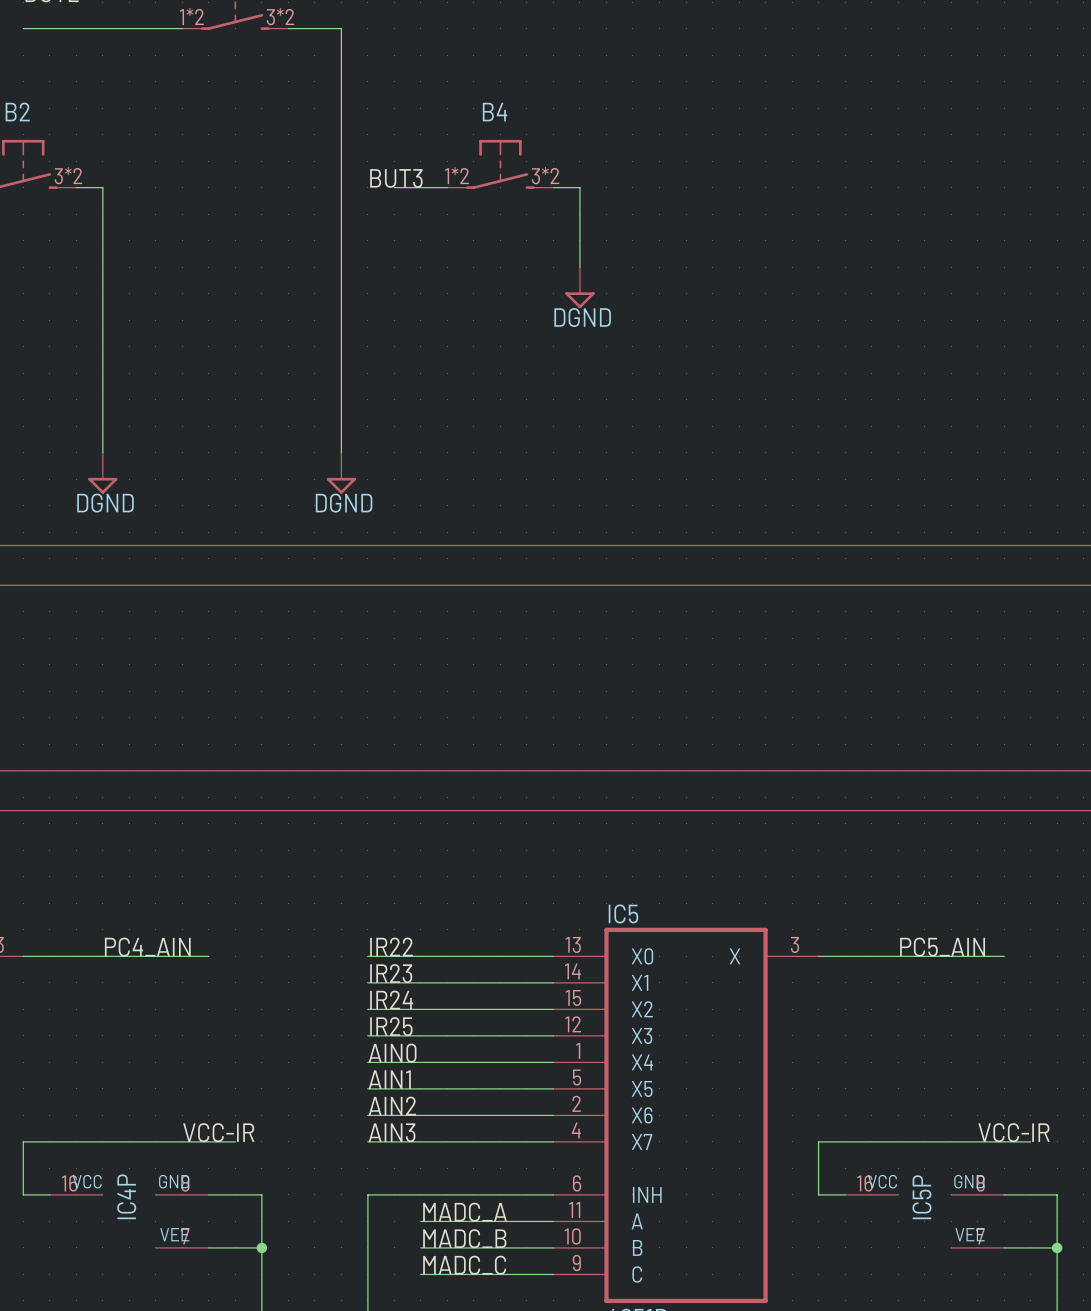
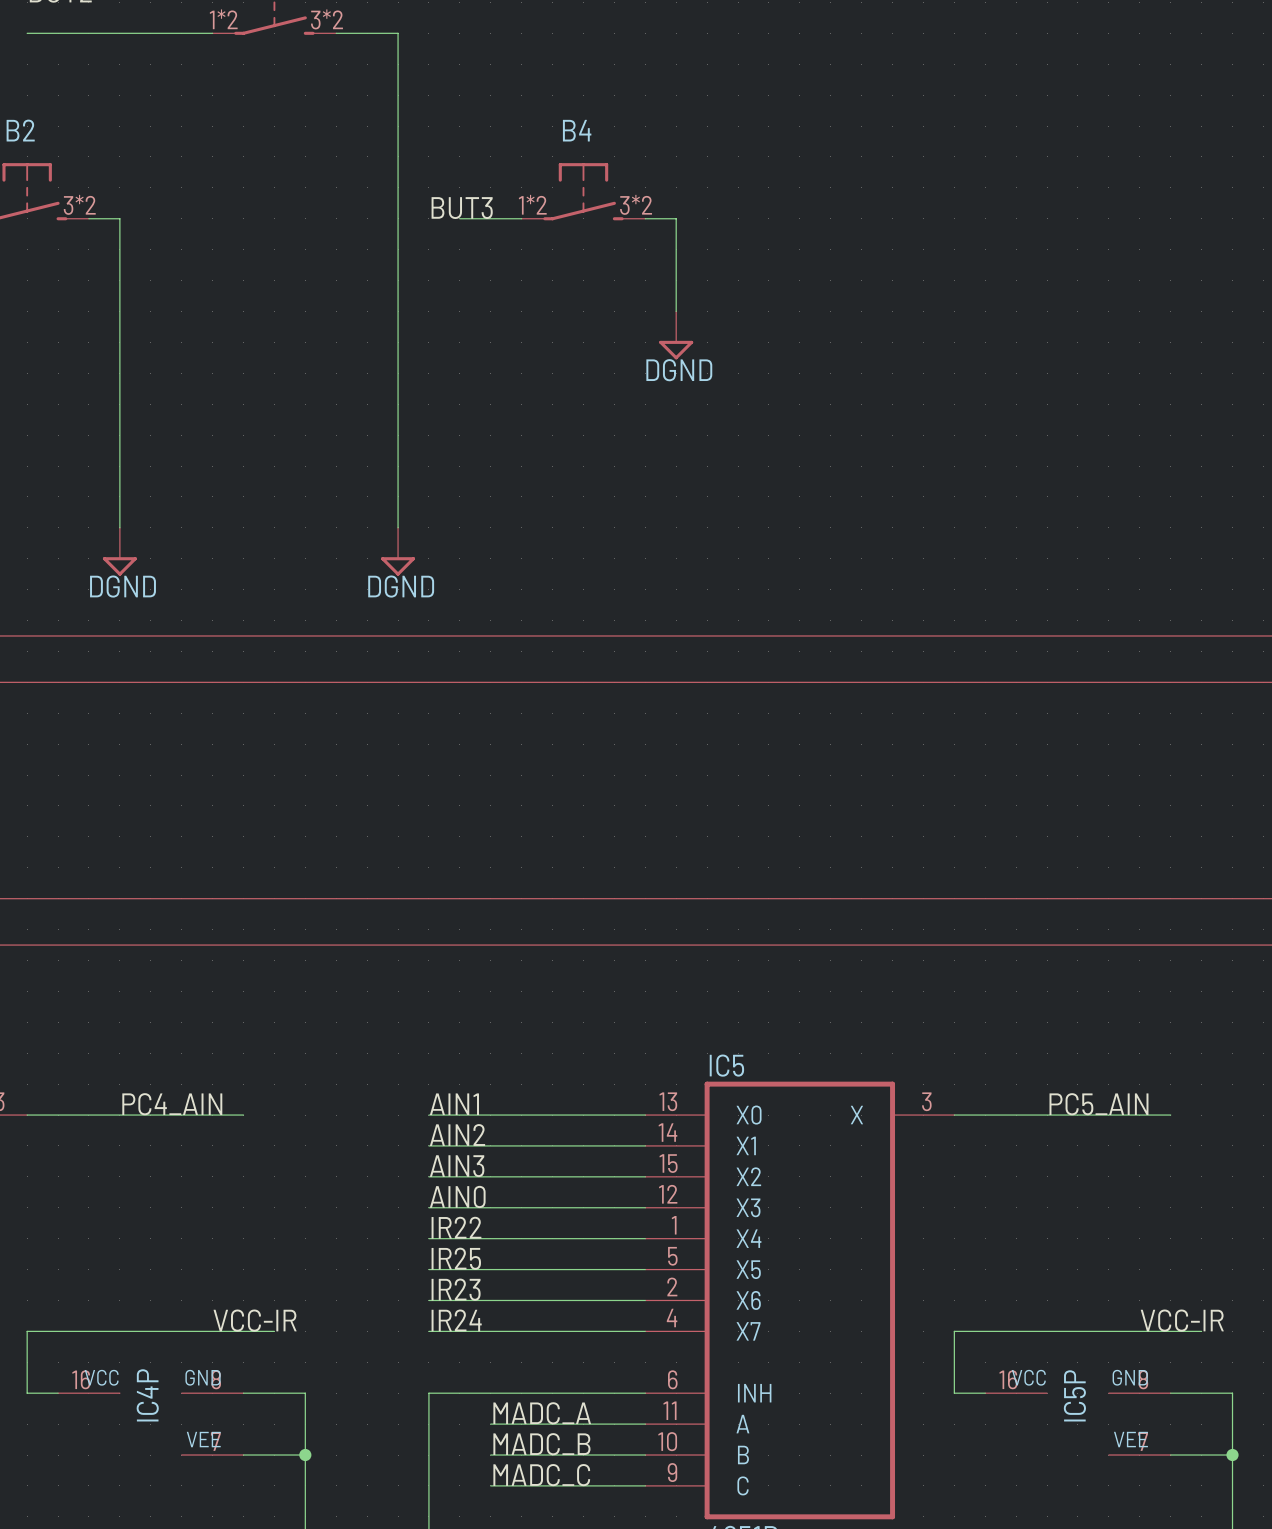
label: IR22 (391, 946) -> AIN1 (454, 1104)
label: IR23 (391, 973) -> AIN2 (457, 1135)
label: IR24 (391, 999) -> AIN3 (457, 1166)
label: IR25 (391, 1026) -> AIN0 (457, 1196)
label: AIN0 (392, 1053) -> IR22 (456, 1227)
label: AIN1 (389, 1079) -> IR25 (456, 1258)
label: AIN2 (392, 1106) -> IR23 (456, 1289)
label: AIN3 (392, 1132) -> IR24 (456, 1320)

